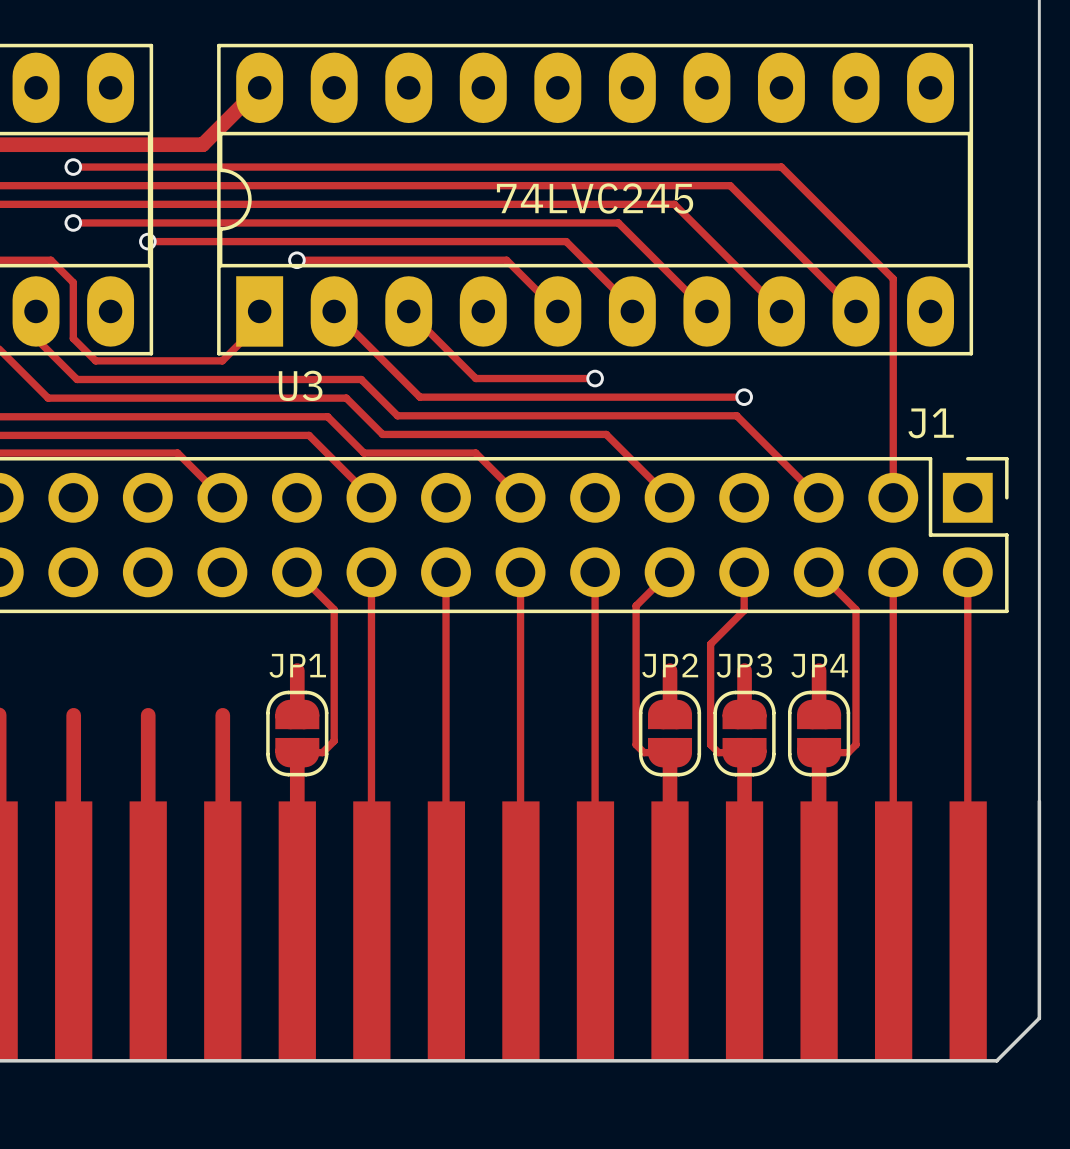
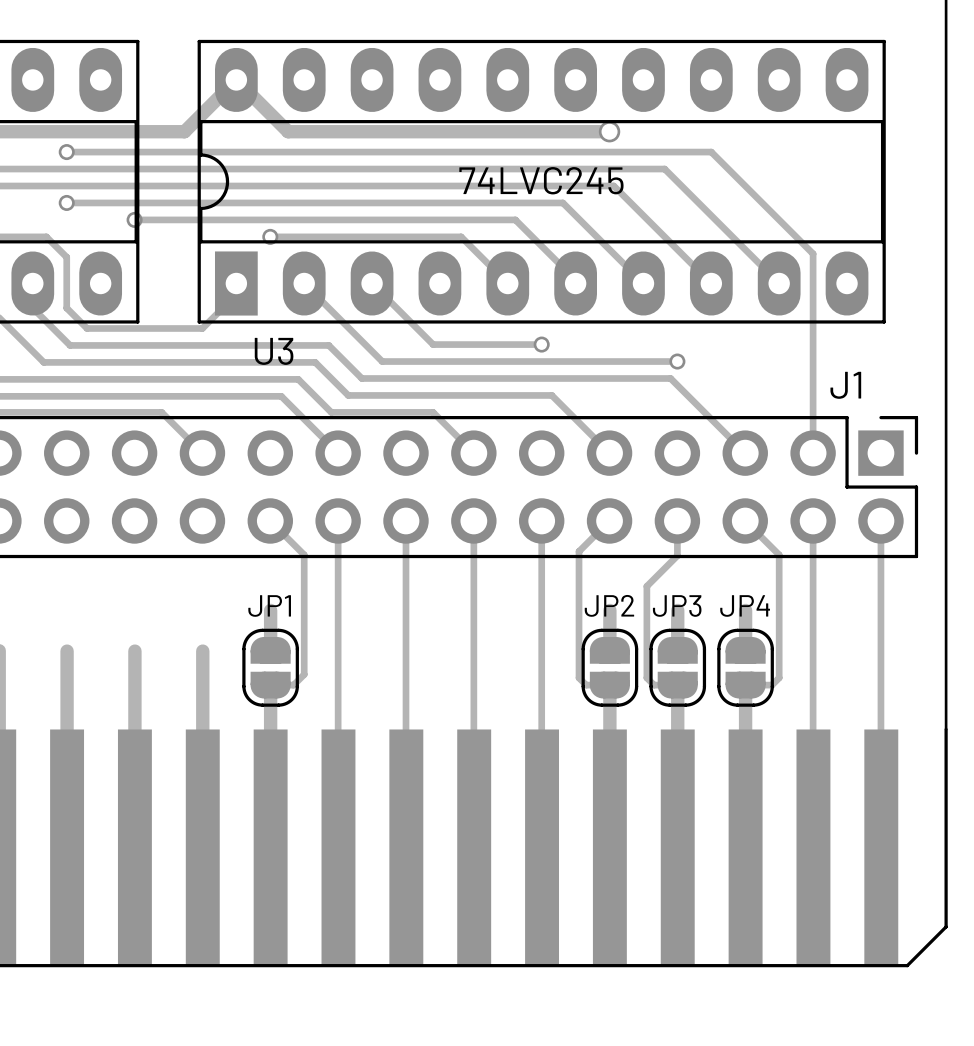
track: none -> (236, 79) (288, 131) (609, 131)
via: none -> (609, 131)

